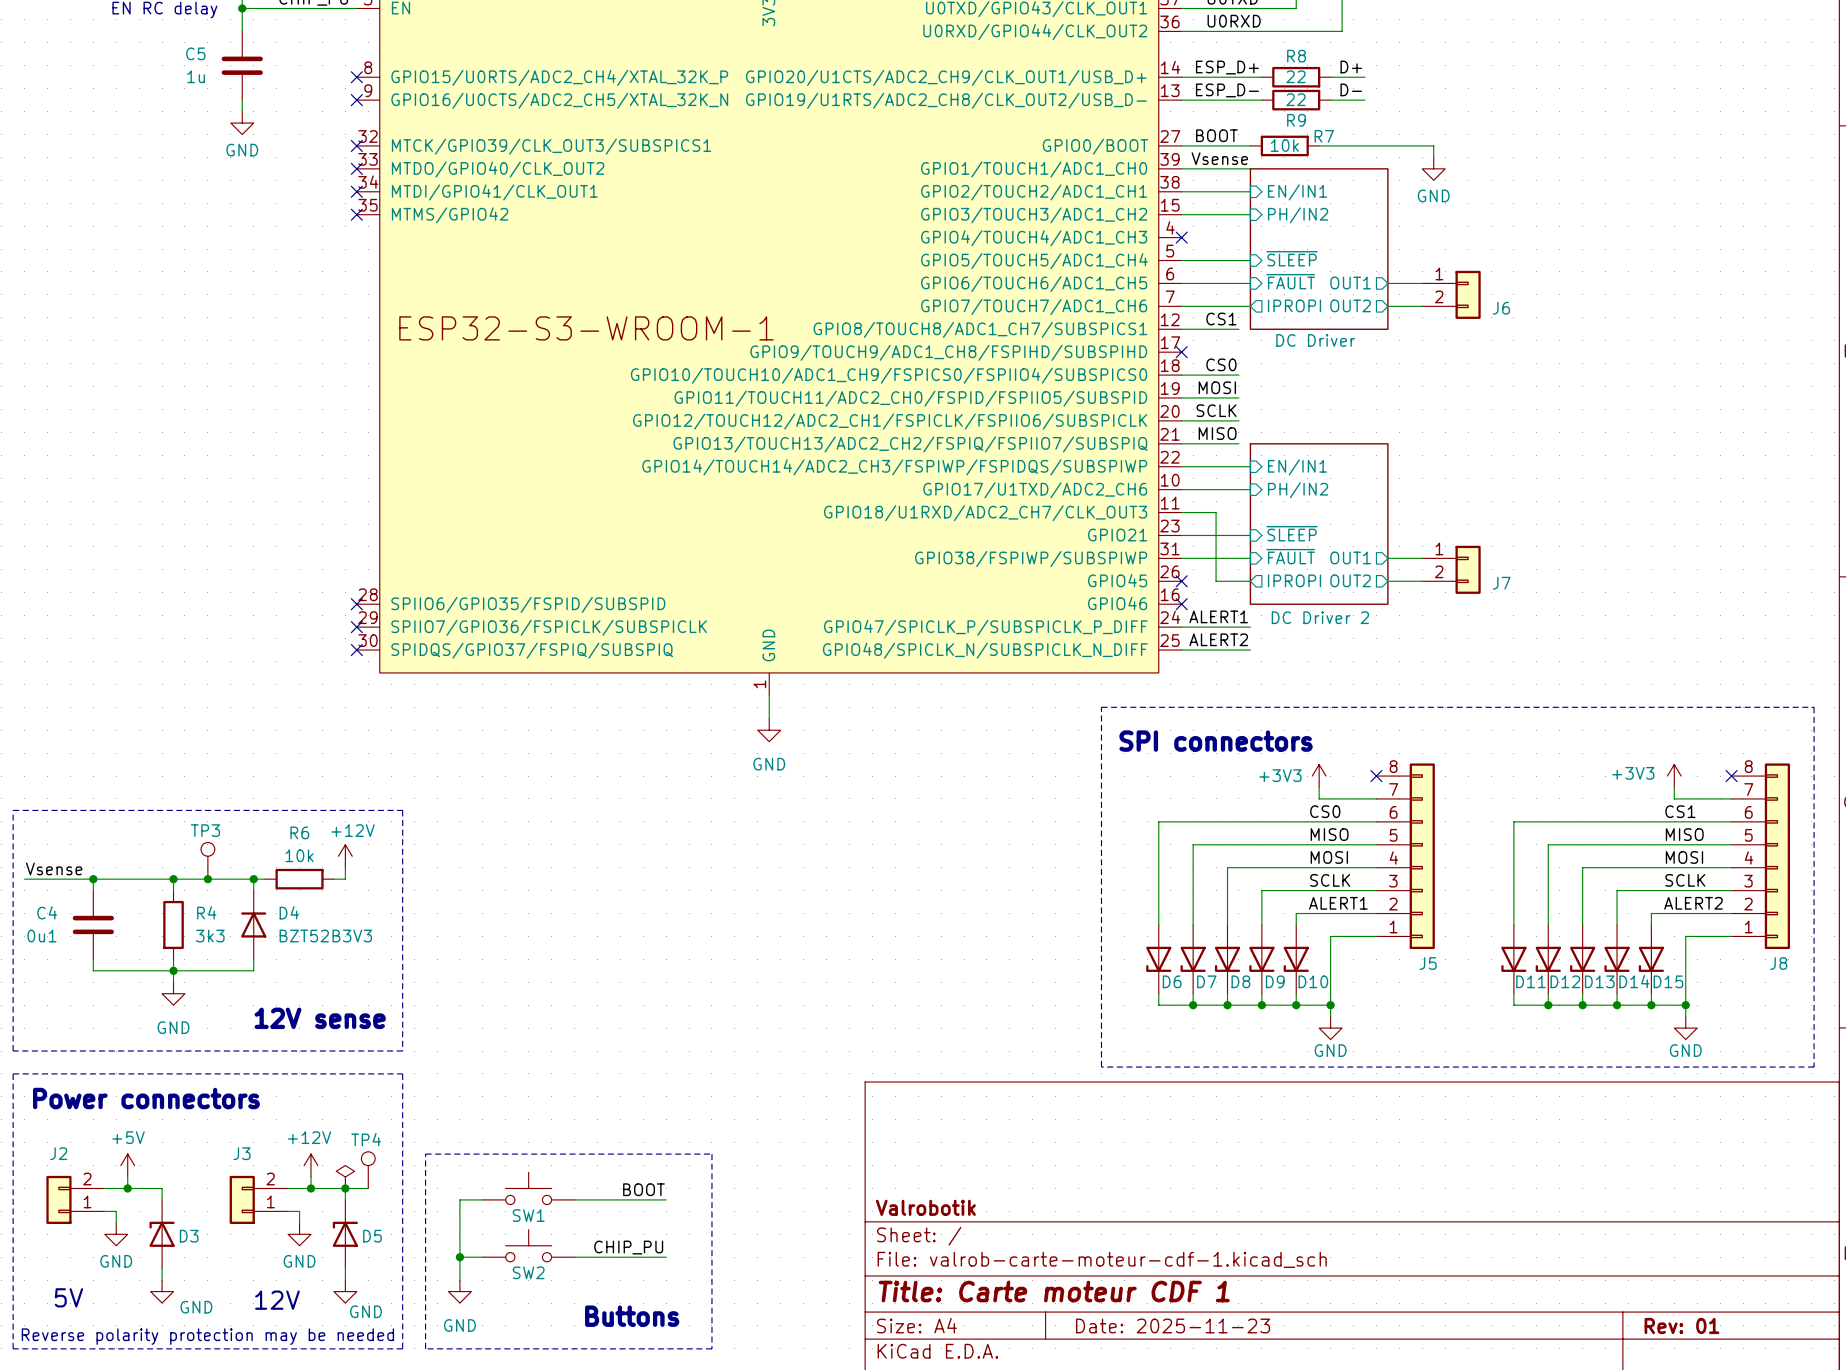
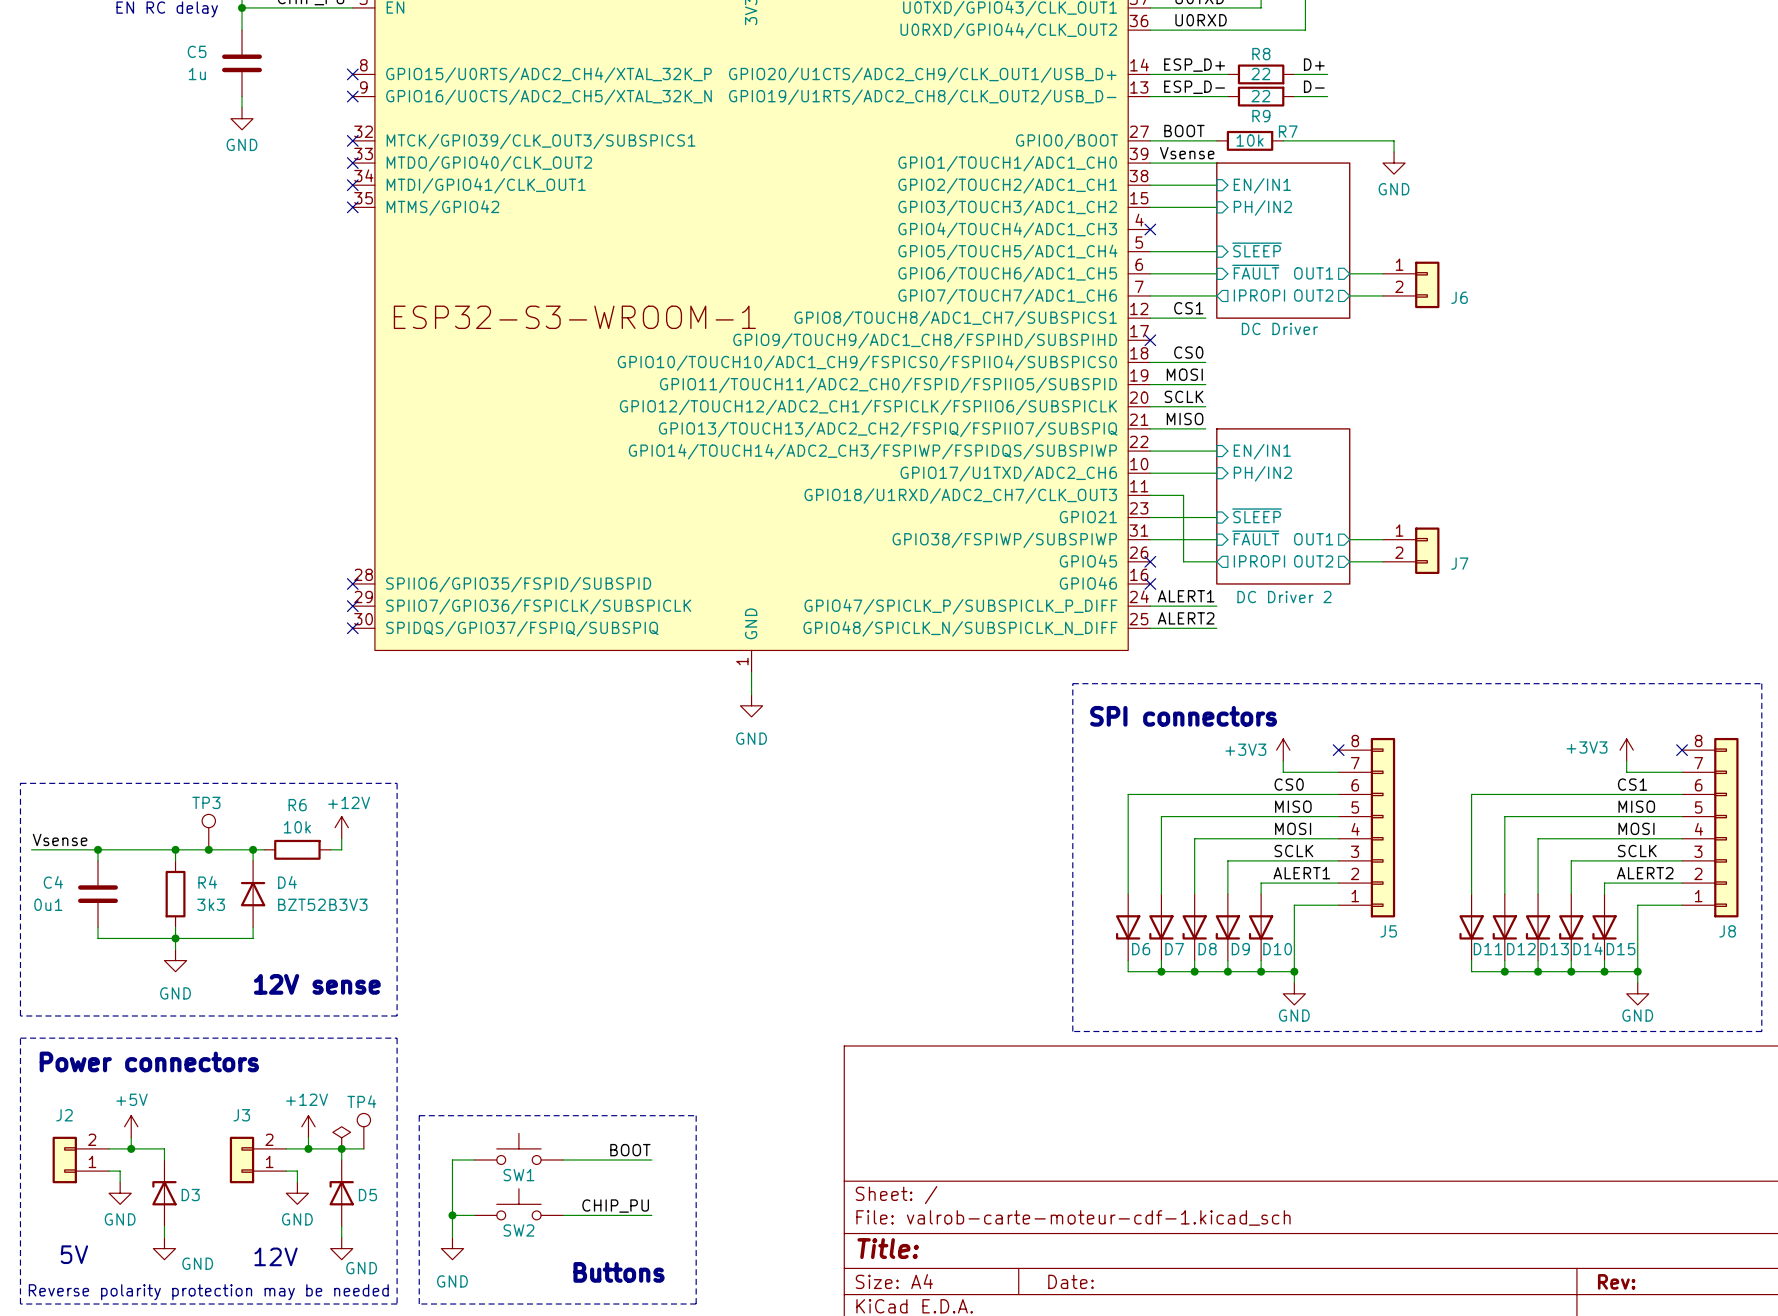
title block: Valrobotik (925, 1207) -> none
title block: Title: Carte moteur CDF 1 (1054, 1291) -> Title: (888, 1248)
title block: Date: 2025-11-23 (1173, 1325) -> Date: (1070, 1281)
title block: Rev: 01 (1682, 1325) -> Rev: (1616, 1281)

